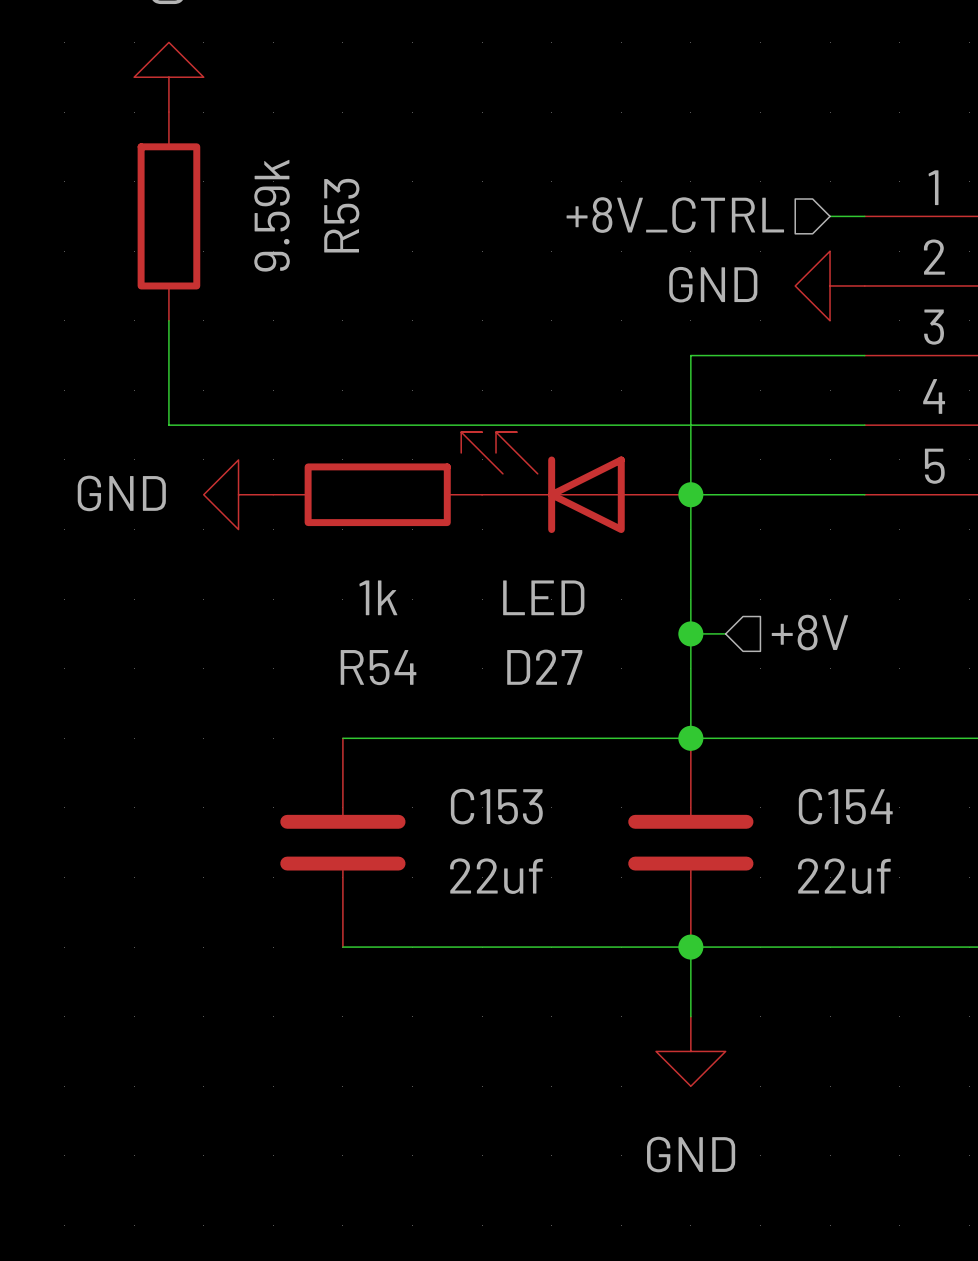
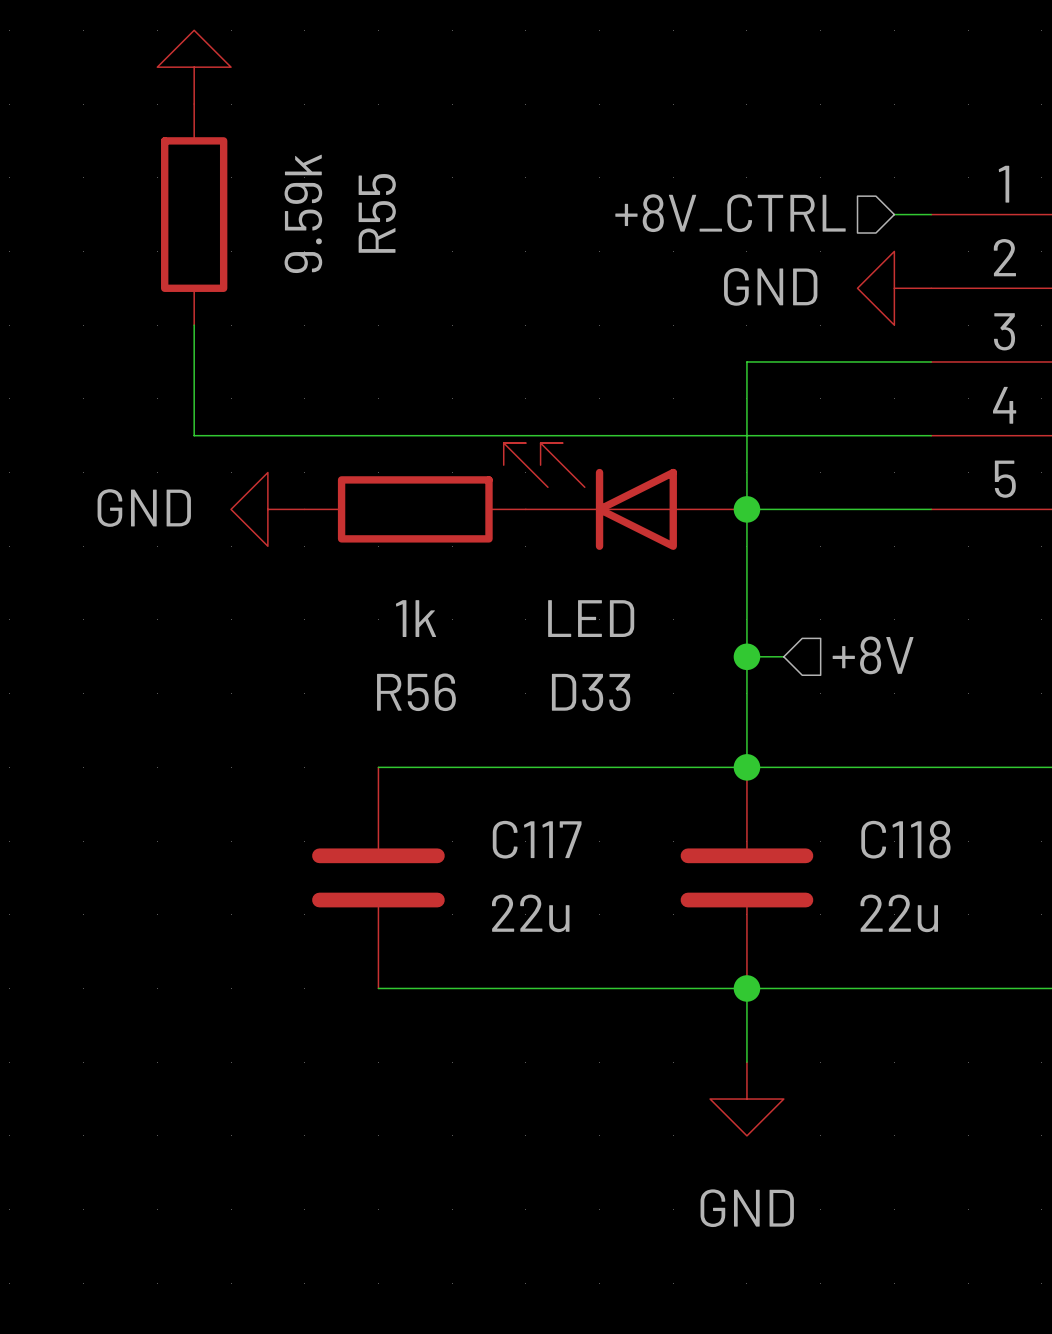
R53 name: R53 (341, 215) -> R55 (377, 213)
R54 name: R54 (378, 667) -> R56 (416, 692)
D27 name: D27 (544, 667) -> D33 (591, 692)
C153 name: C153 (496, 806) -> C117 (537, 839)
C154 name: C154 (845, 806) -> C118 (905, 839)
C153 value: 22uf (496, 876) -> 22u (530, 913)
C154 value: 22uf (844, 876) -> 22u (899, 913)

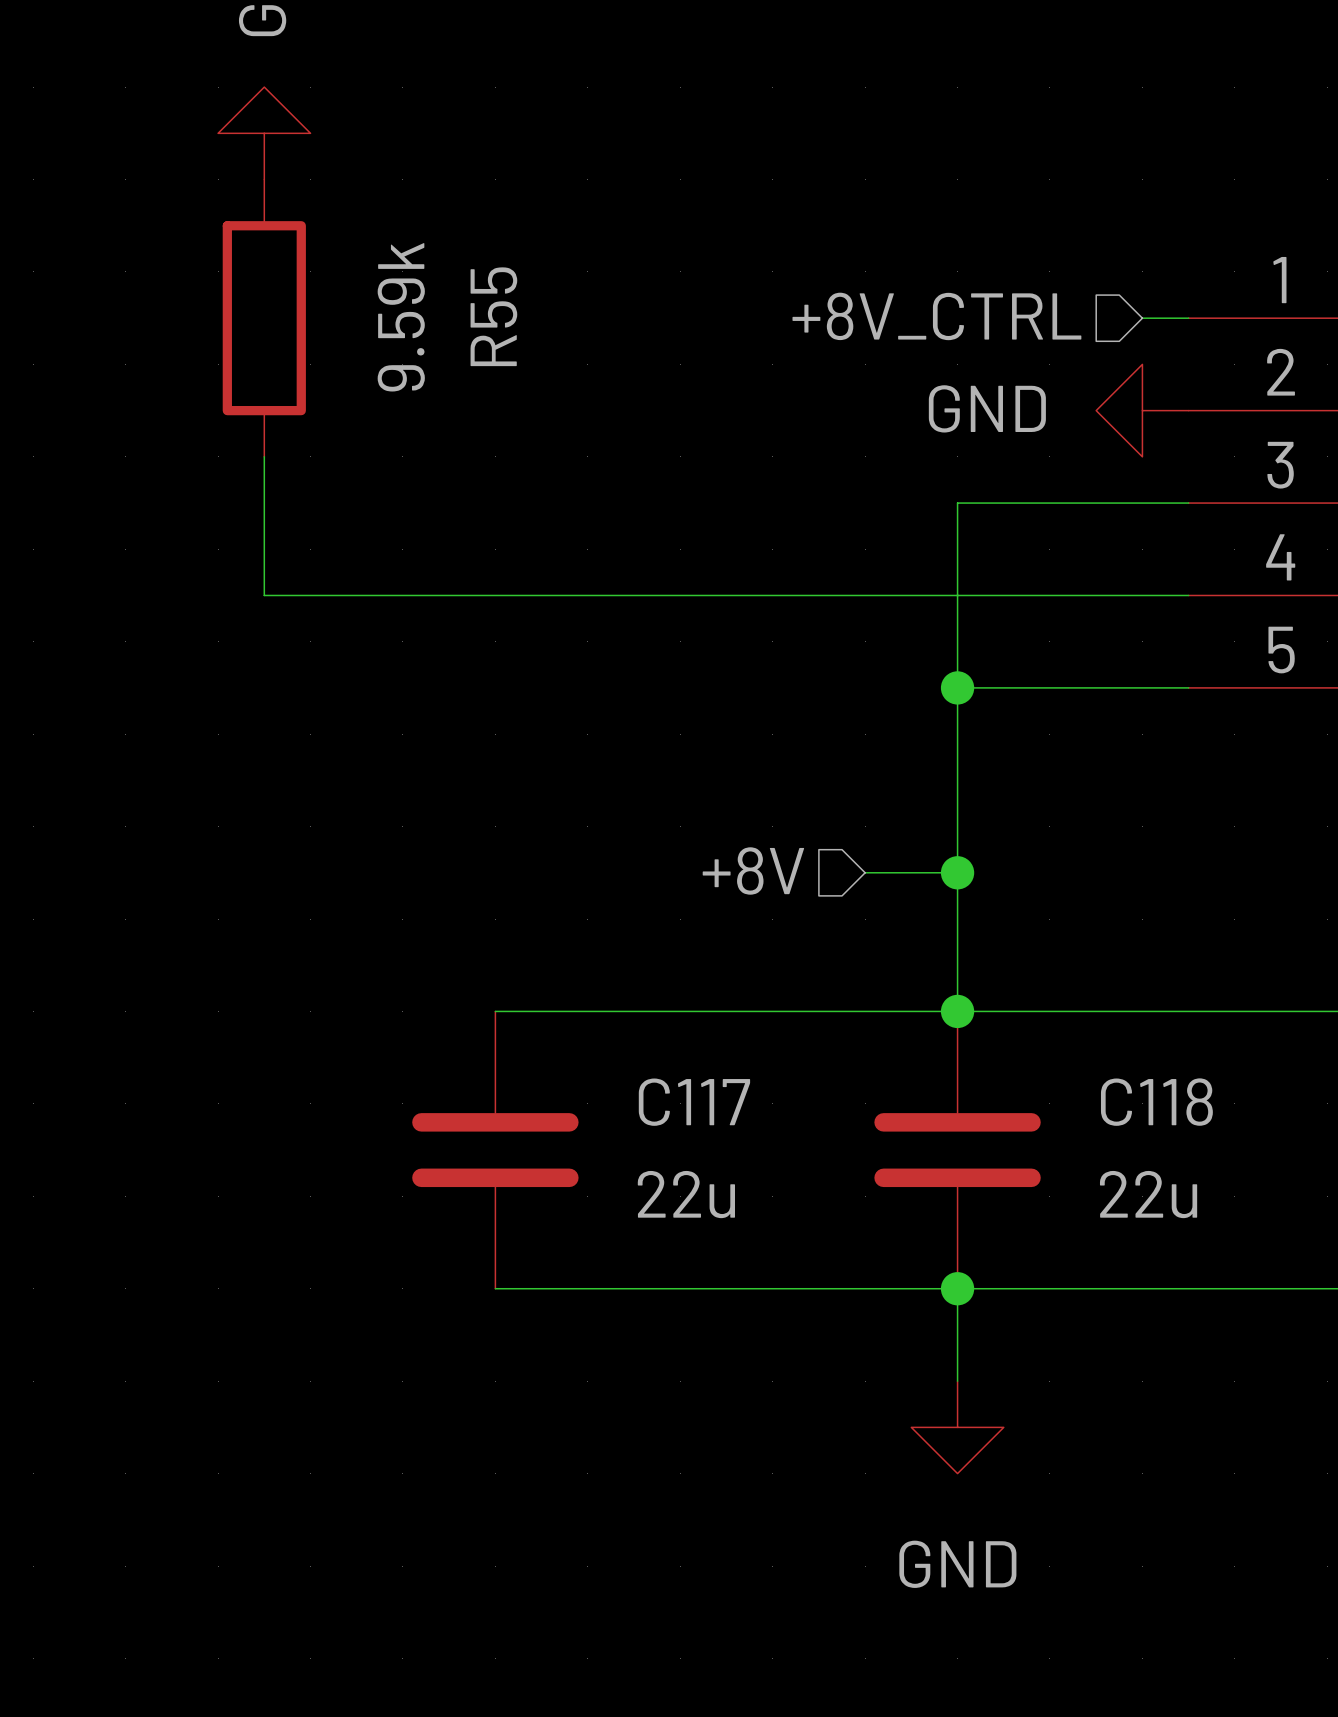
D33: LED (625, 496) -> none
power symbol: GND (267, 509) -> none
R56: 1k (415, 509) -> none
hierarchical label rotation: 0° (873, 655) -> 180° (753, 870)
hierarchical label position: +8V (873, 655) -> +8V (753, 870)
wire: (746, 656) (783, 656) -> (957, 872) (865, 872)

